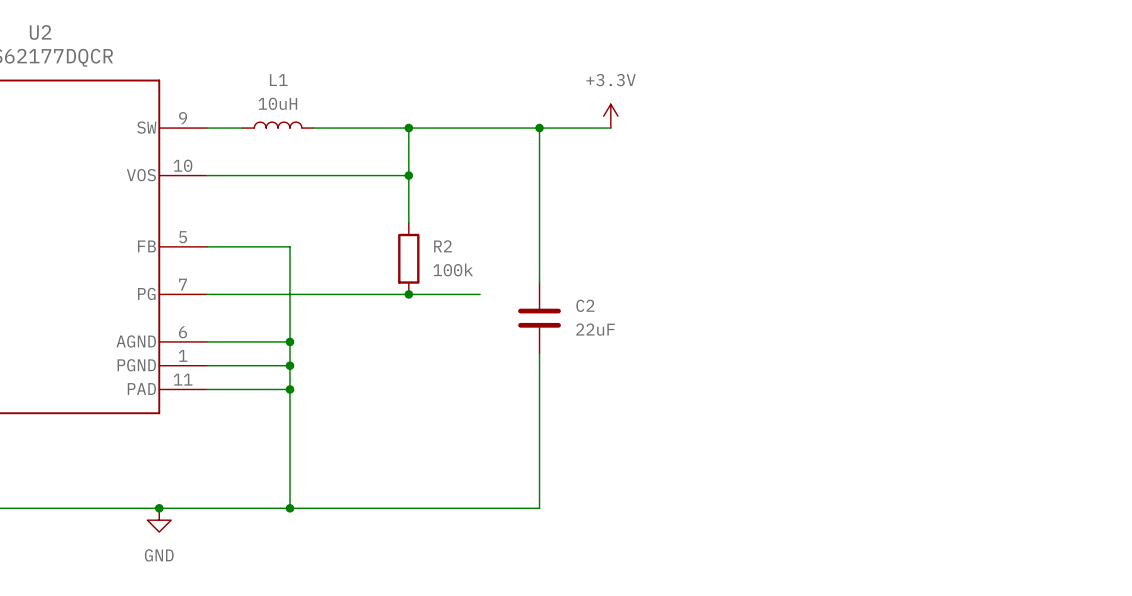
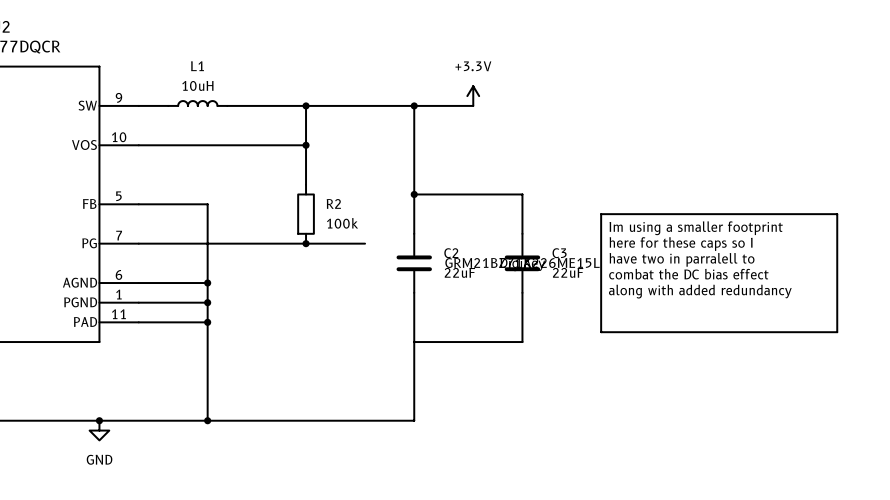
wire: none -> (414, 194) (522, 194) (522, 233)
junction: none -> (414, 194)
line: none -> (601, 214) (837, 214) (837, 332) (601, 332) (601, 214)
text: none -> Im using a smaller footprint (696, 228)
text: none -> here for these caps so I (681, 244)
text: none -> have two in parralell to (682, 259)
C3: none -> 22uF (522, 263)
text: none -> combat the DC bias effect (688, 274)
text: none -> along with added redundancy (700, 291)
wire: none -> (522, 292) (522, 342) (414, 342)

